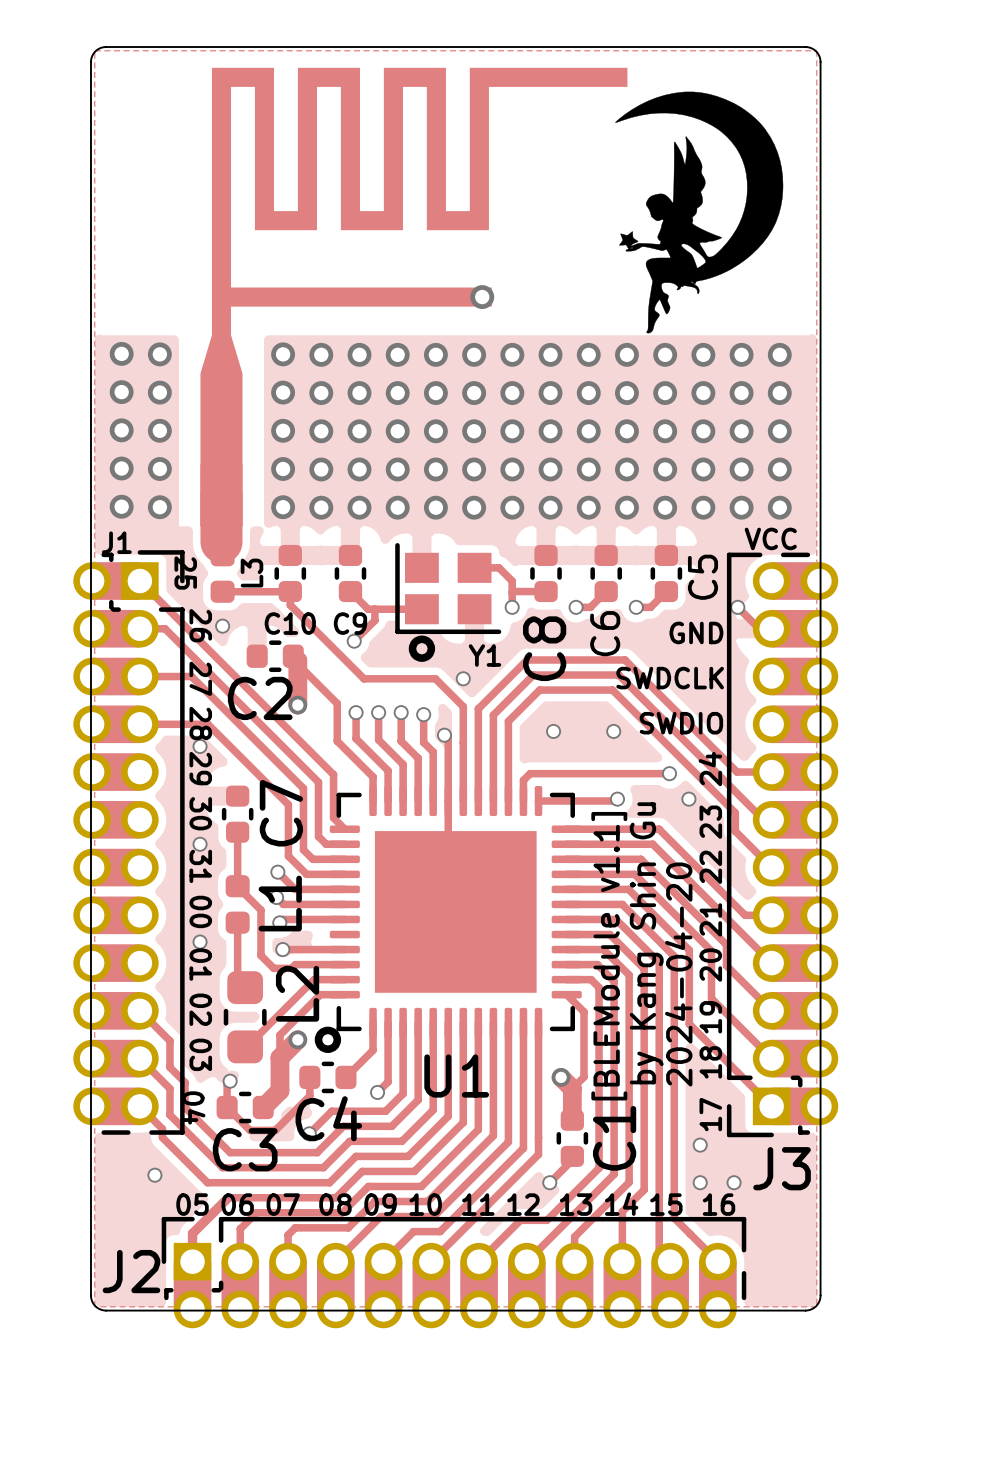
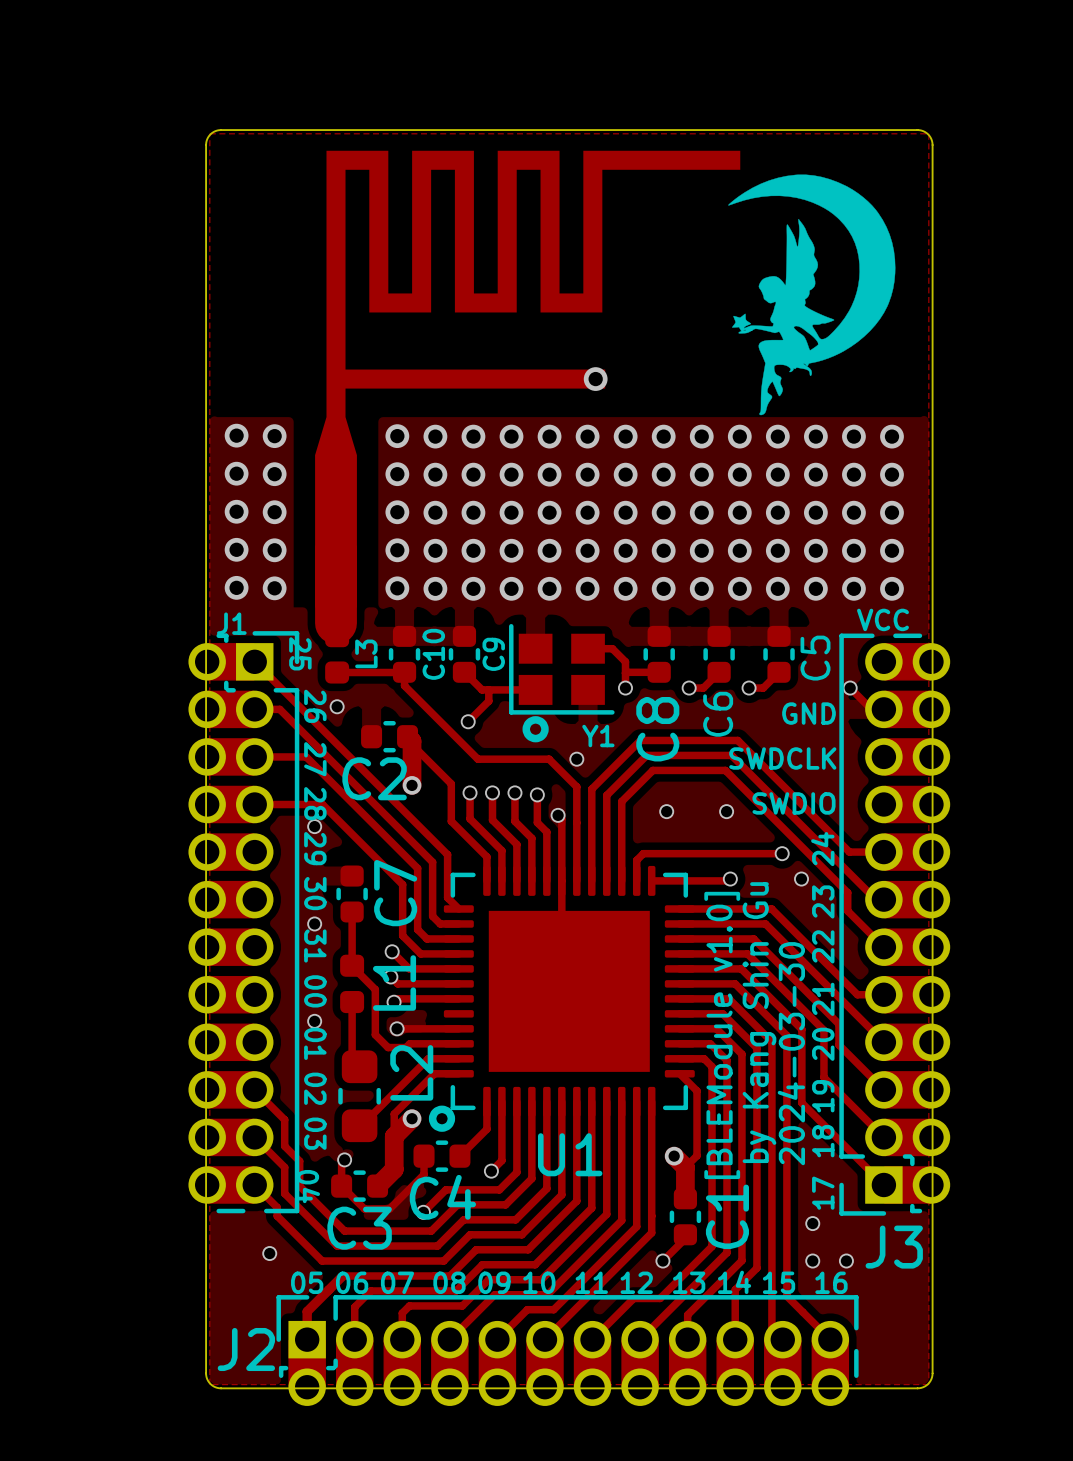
C10 name rotation: 0° (290, 623) -> 90° counterclockwise (433, 654)
C9 name rotation: 0° (350, 623) -> 90° counterclockwise (493, 654)
C9 name position: C9 (350, 623) -> C9 (493, 654)
text: [BLEModule v1.1] (609, 956) -> [BLEModule v1.0] (722, 1035)
text: 2024-04-20 (678, 974) -> 2024-03-30 (791, 1053)

